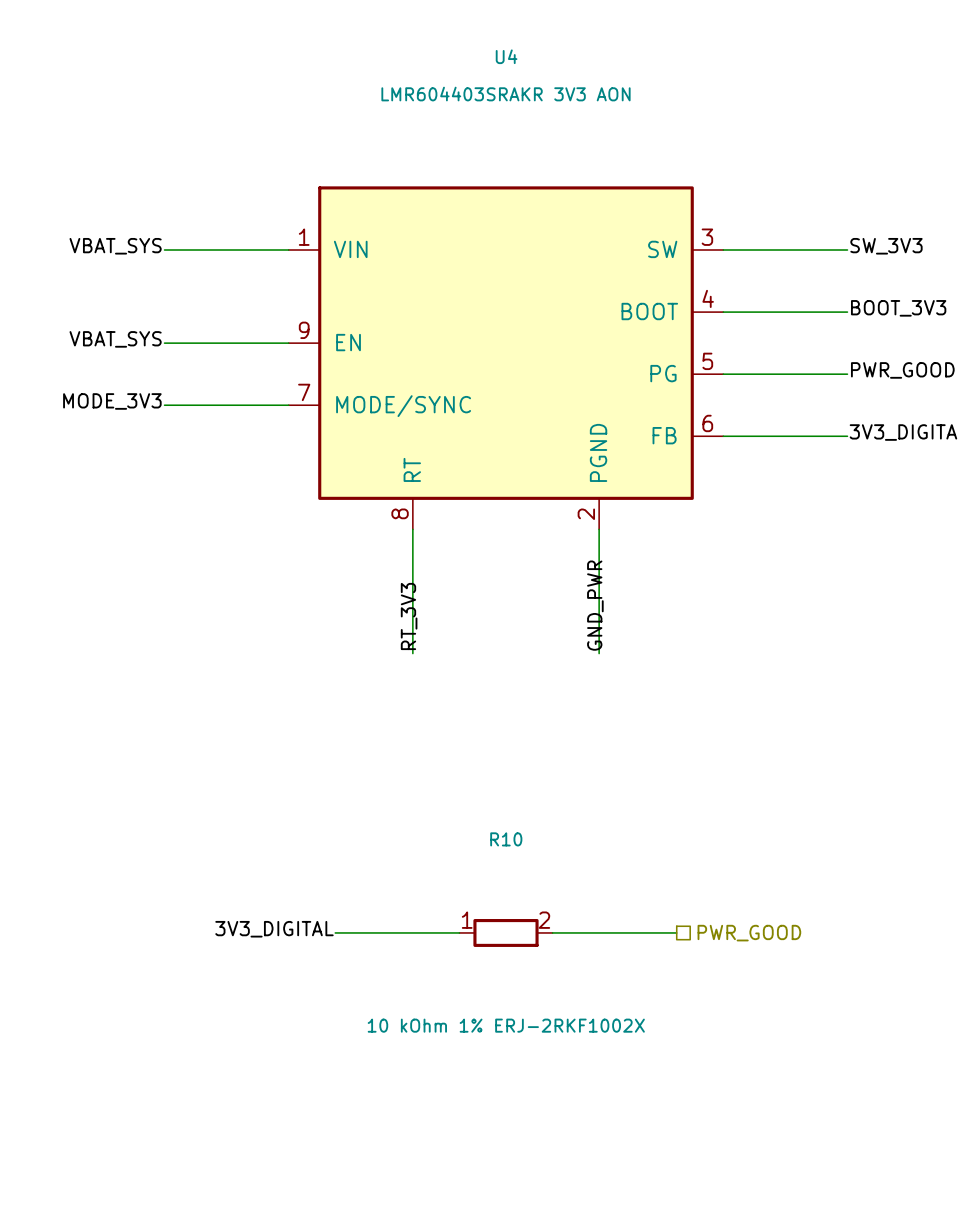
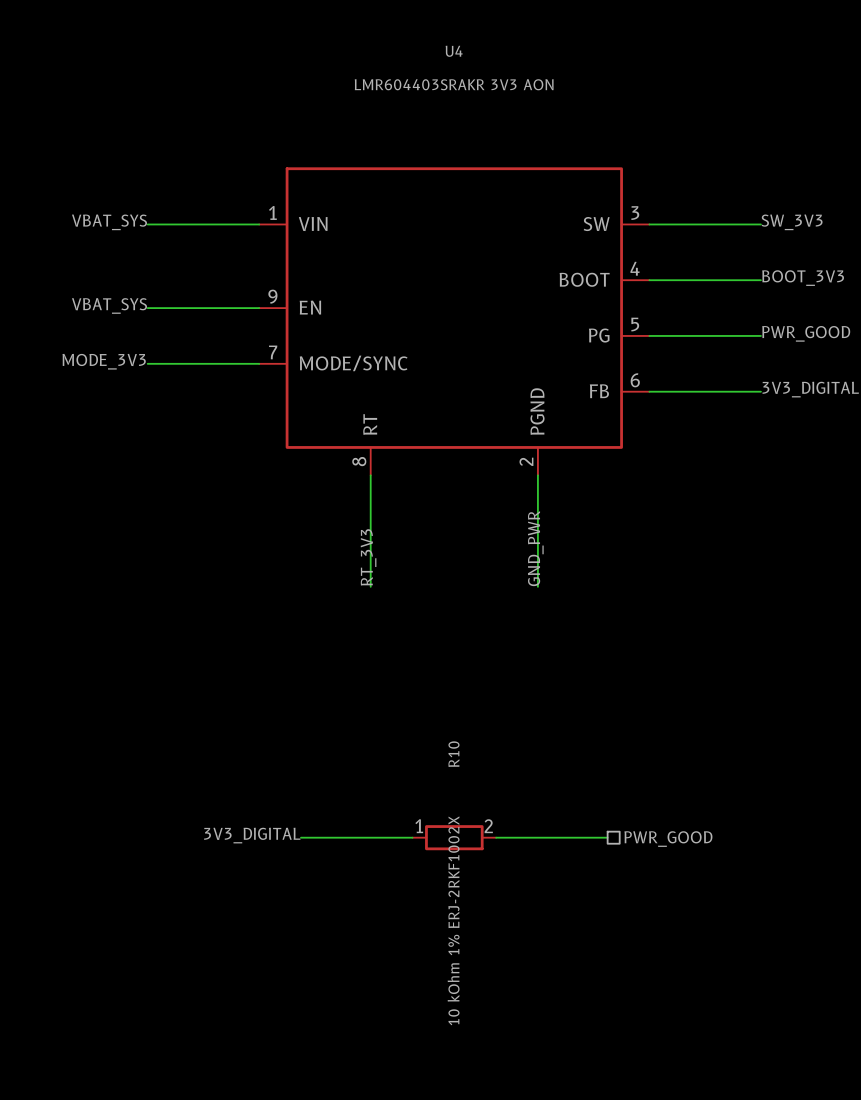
R10 name rotation: 0° (506, 839) -> 90° counterclockwise (453, 754)
R10 value rotation: 0° (506, 1025) -> 90° counterclockwise (453, 920)

